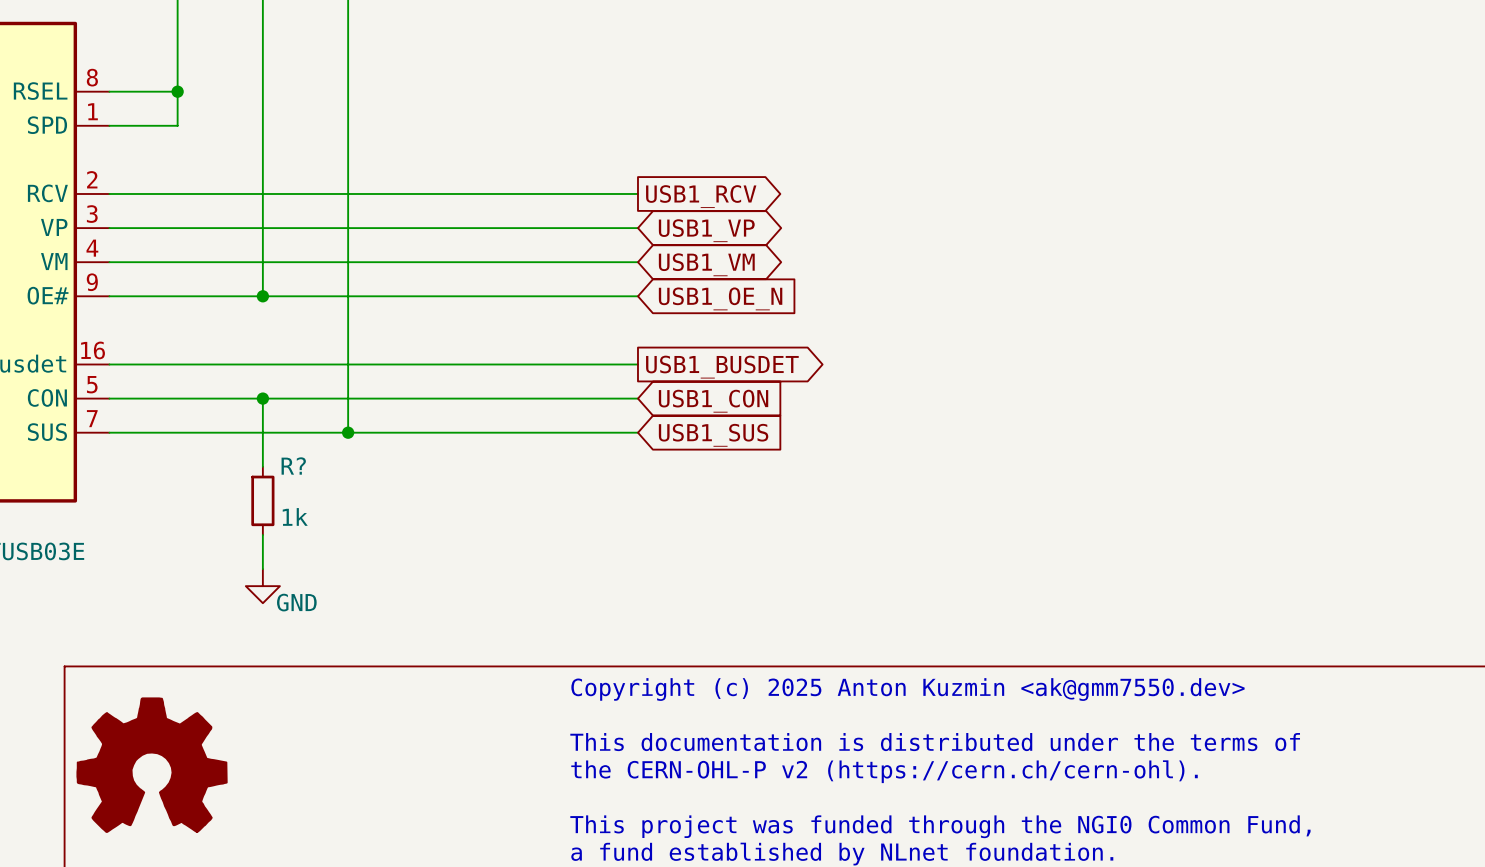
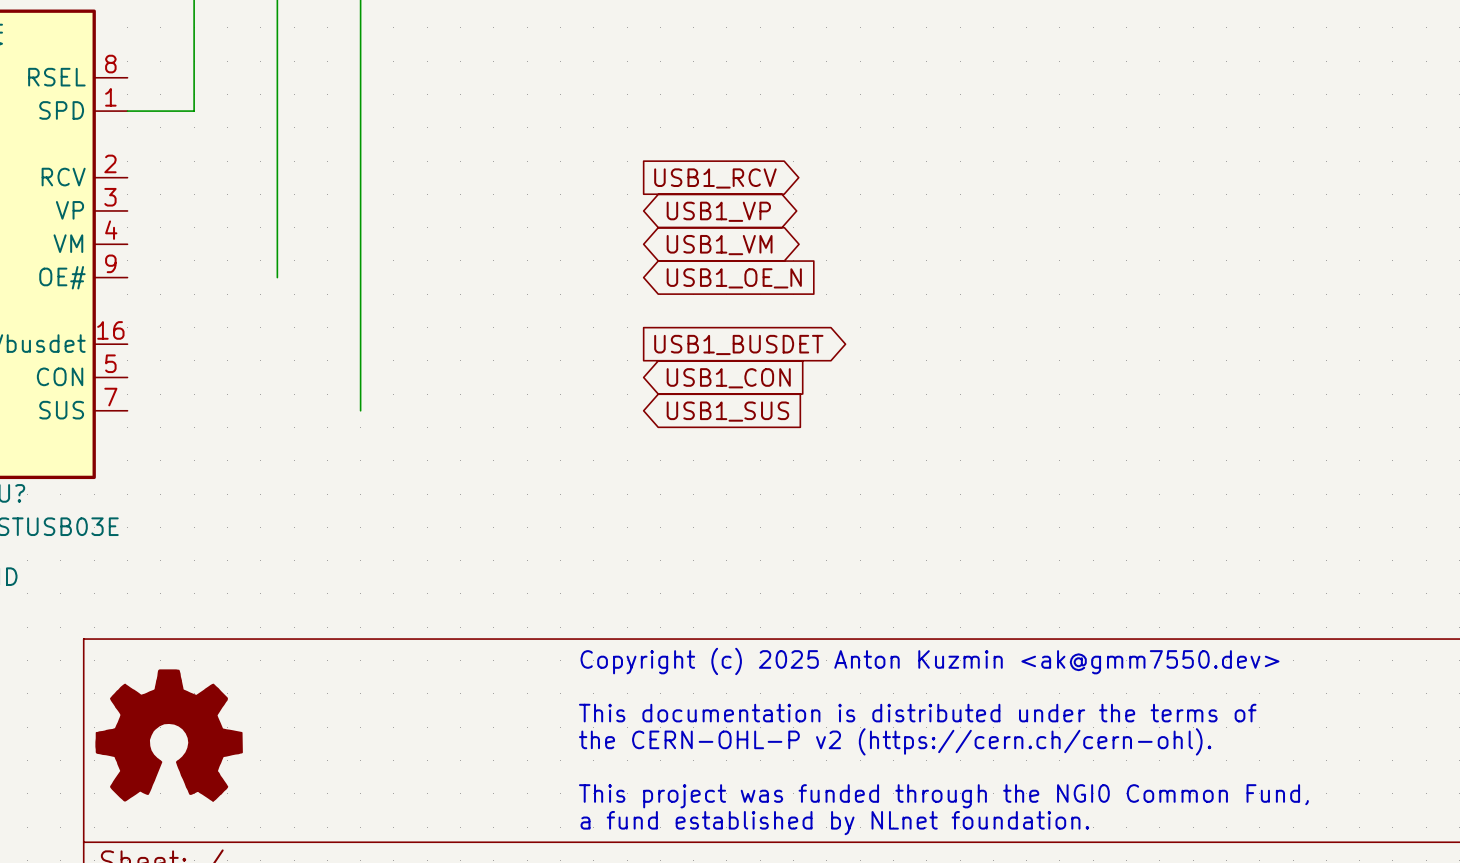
wire: (109, 91) (177, 91) -> none
junction: (177, 91) -> none
wire: (109, 193) (637, 193) -> none
wire: (109, 228) (637, 228) -> none
wire: (109, 262) (637, 262) -> none
wire: (109, 296) (637, 296) -> none
junction: (262, 296) -> none
wire: (109, 364) (637, 364) -> none
wire: (109, 398) (637, 398) -> none
wire: (262, 398) (262, 466) -> none
junction: (262, 398) -> none
wire: (109, 432) (637, 432) -> none
junction: (348, 432) -> none
R?: 1k (262, 500) -> none
wire: (262, 535) (262, 569) -> none
power symbol: GND (262, 586) -> none

